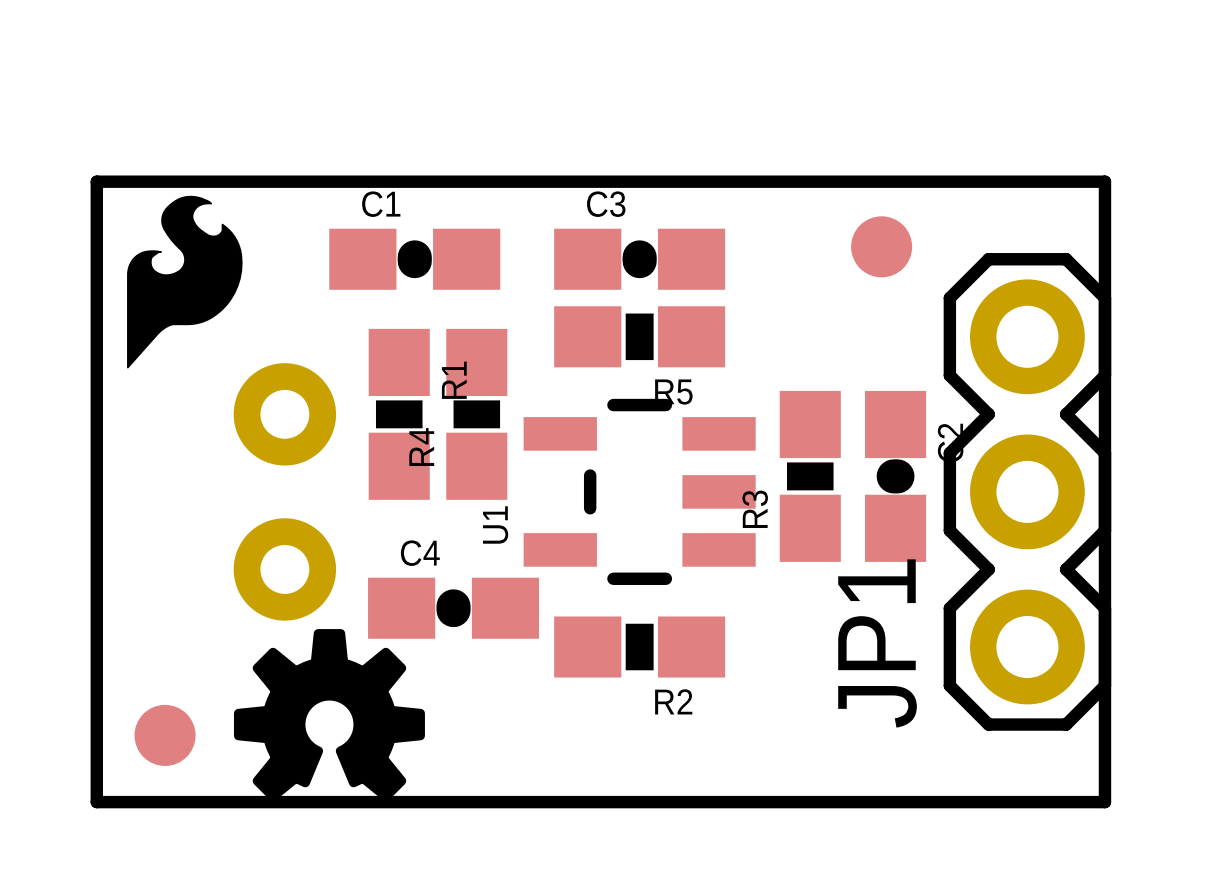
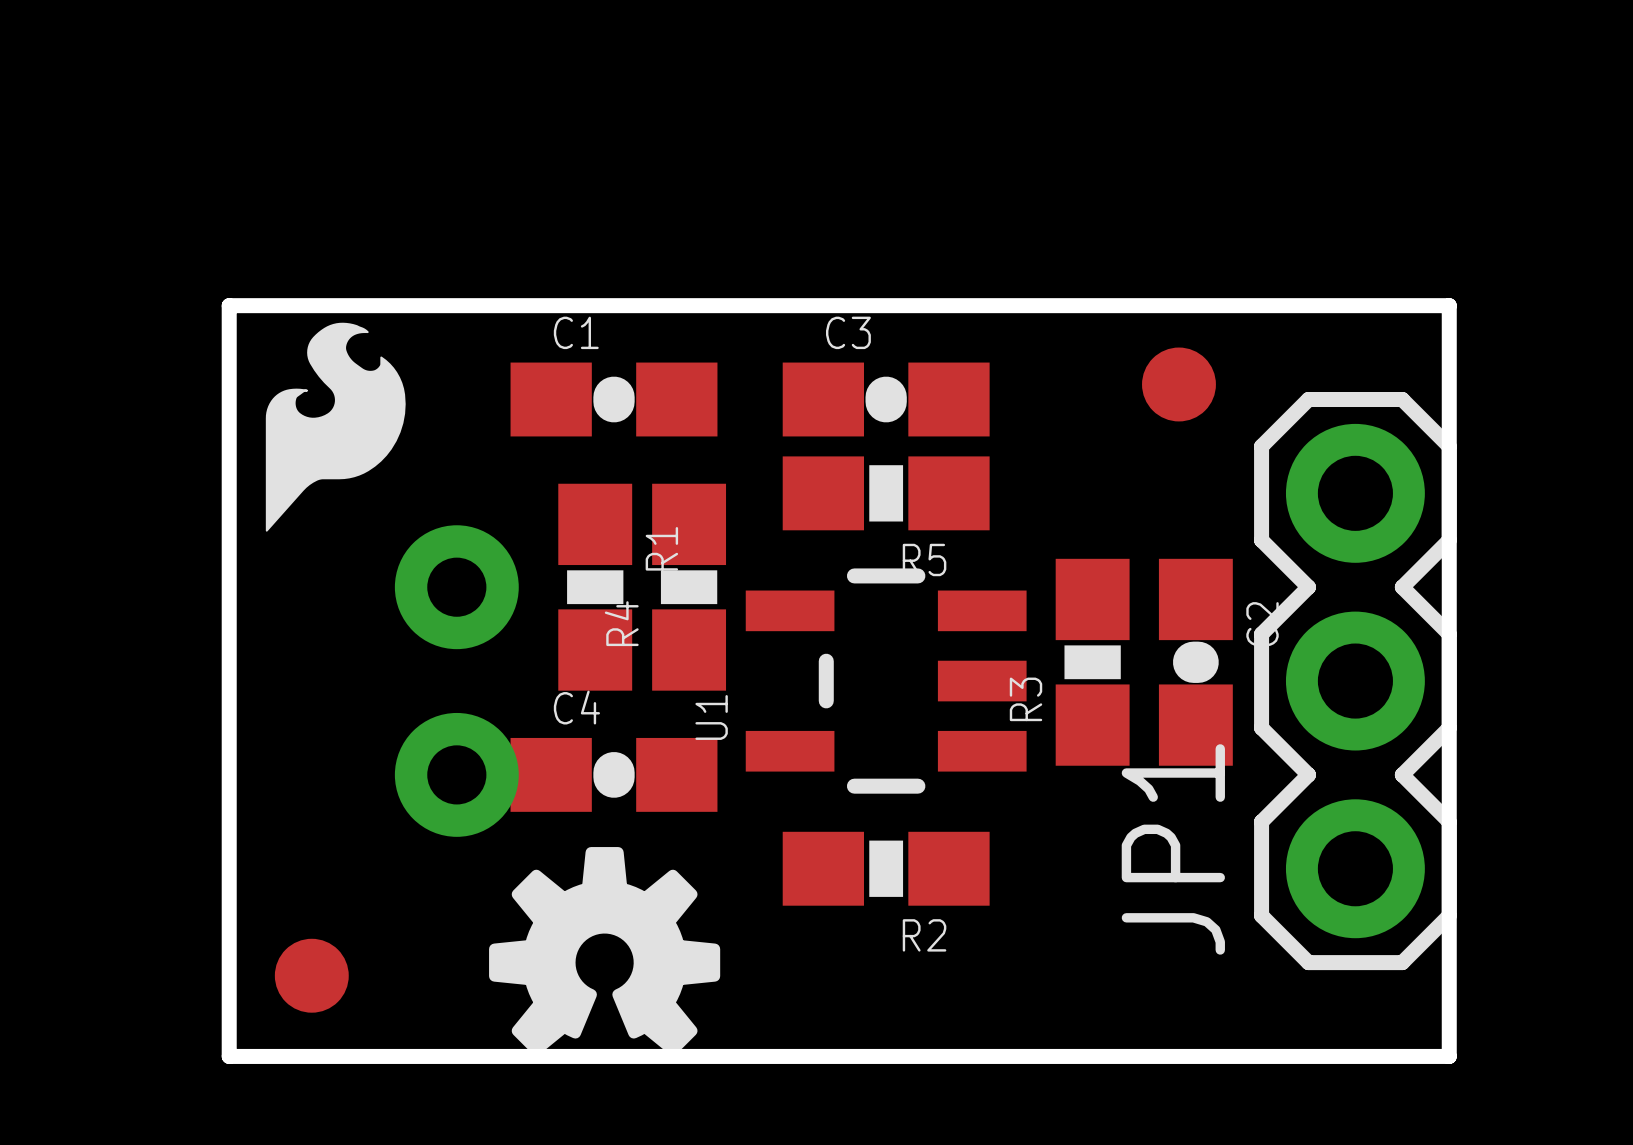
C4 position: (453, 608) -> (614, 774)
drawing position: (329, 715) -> (604, 951)

